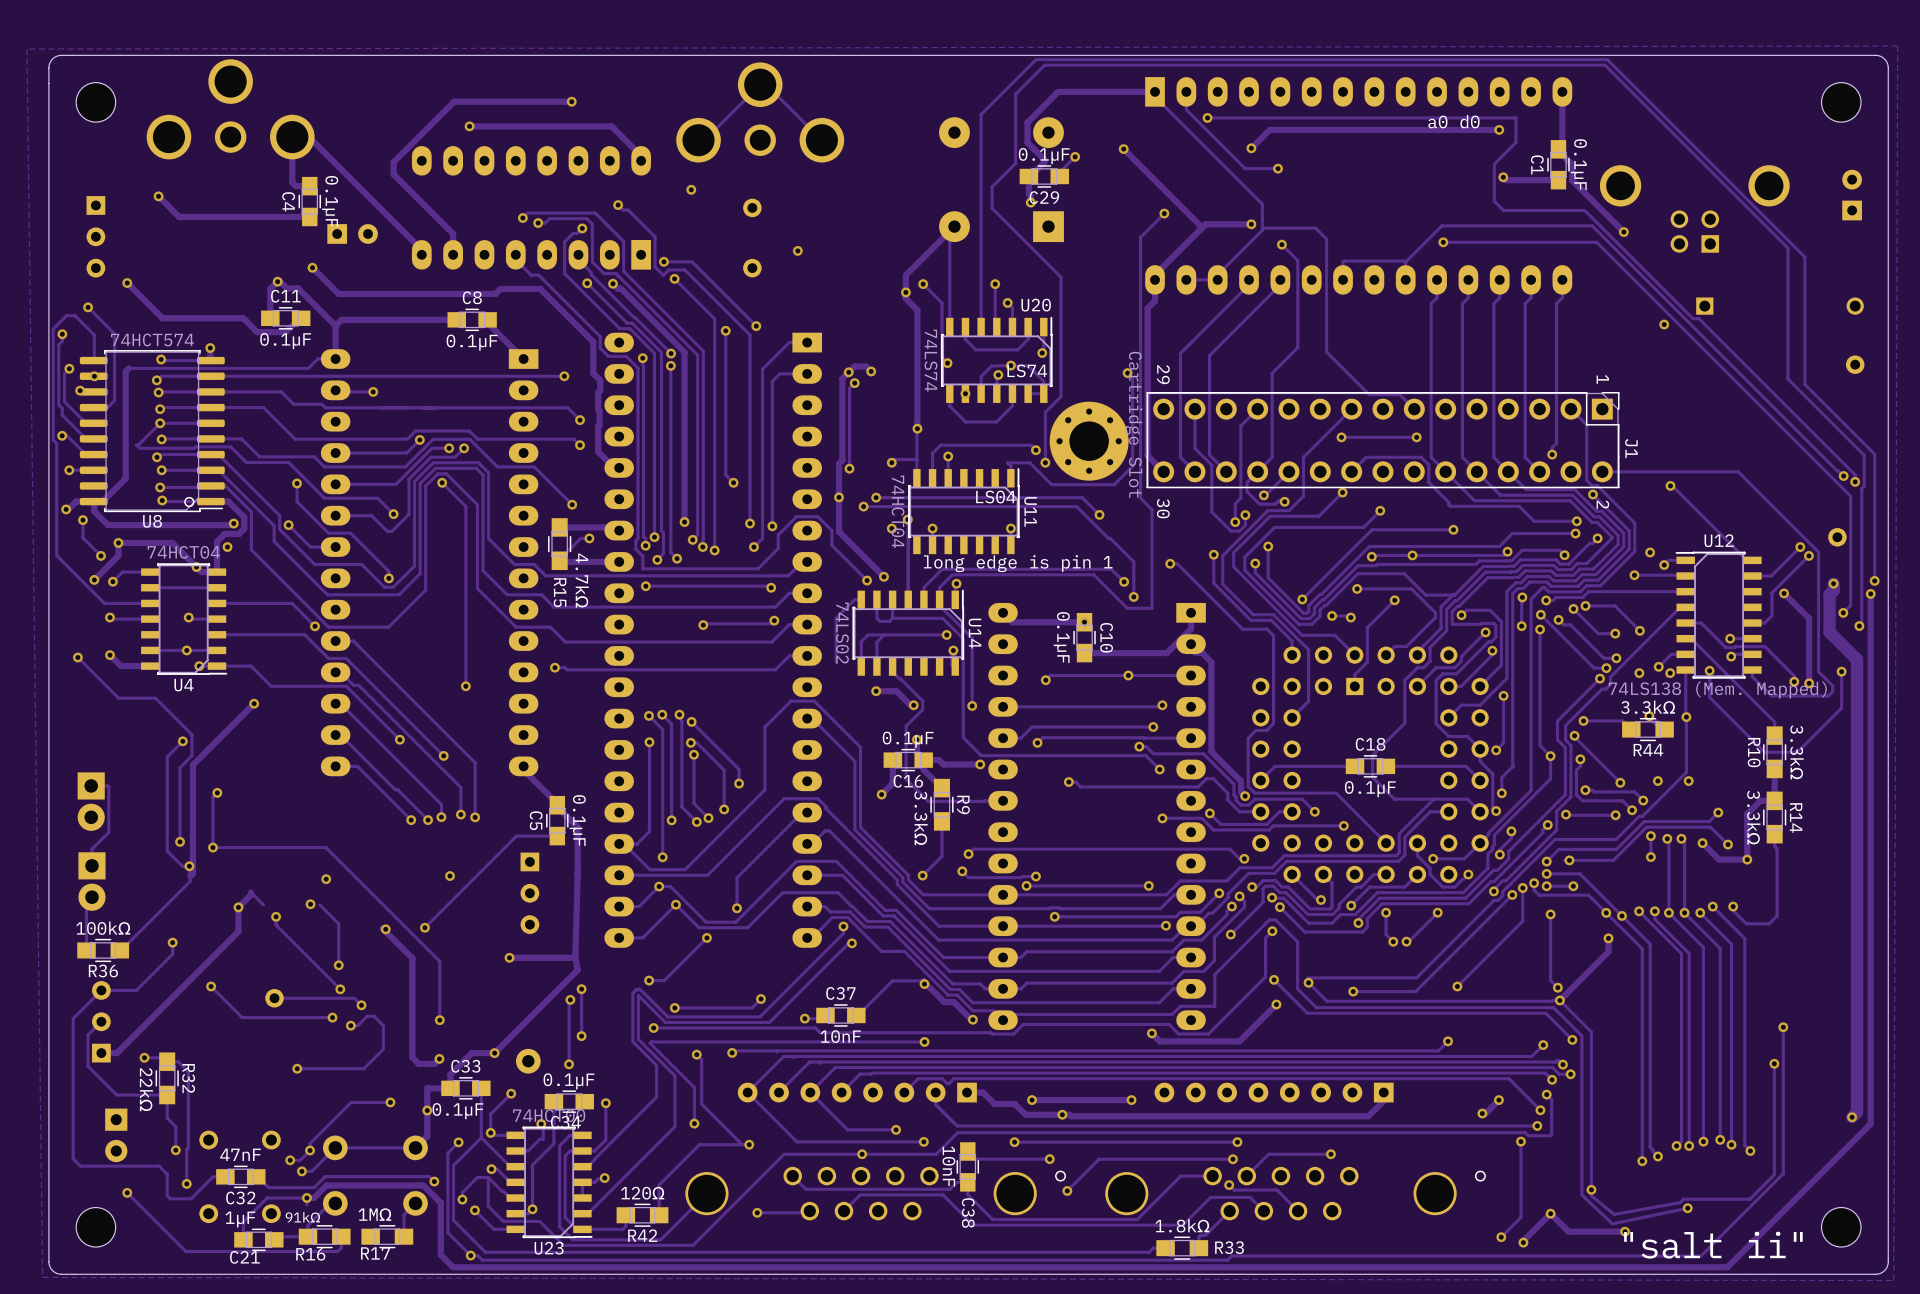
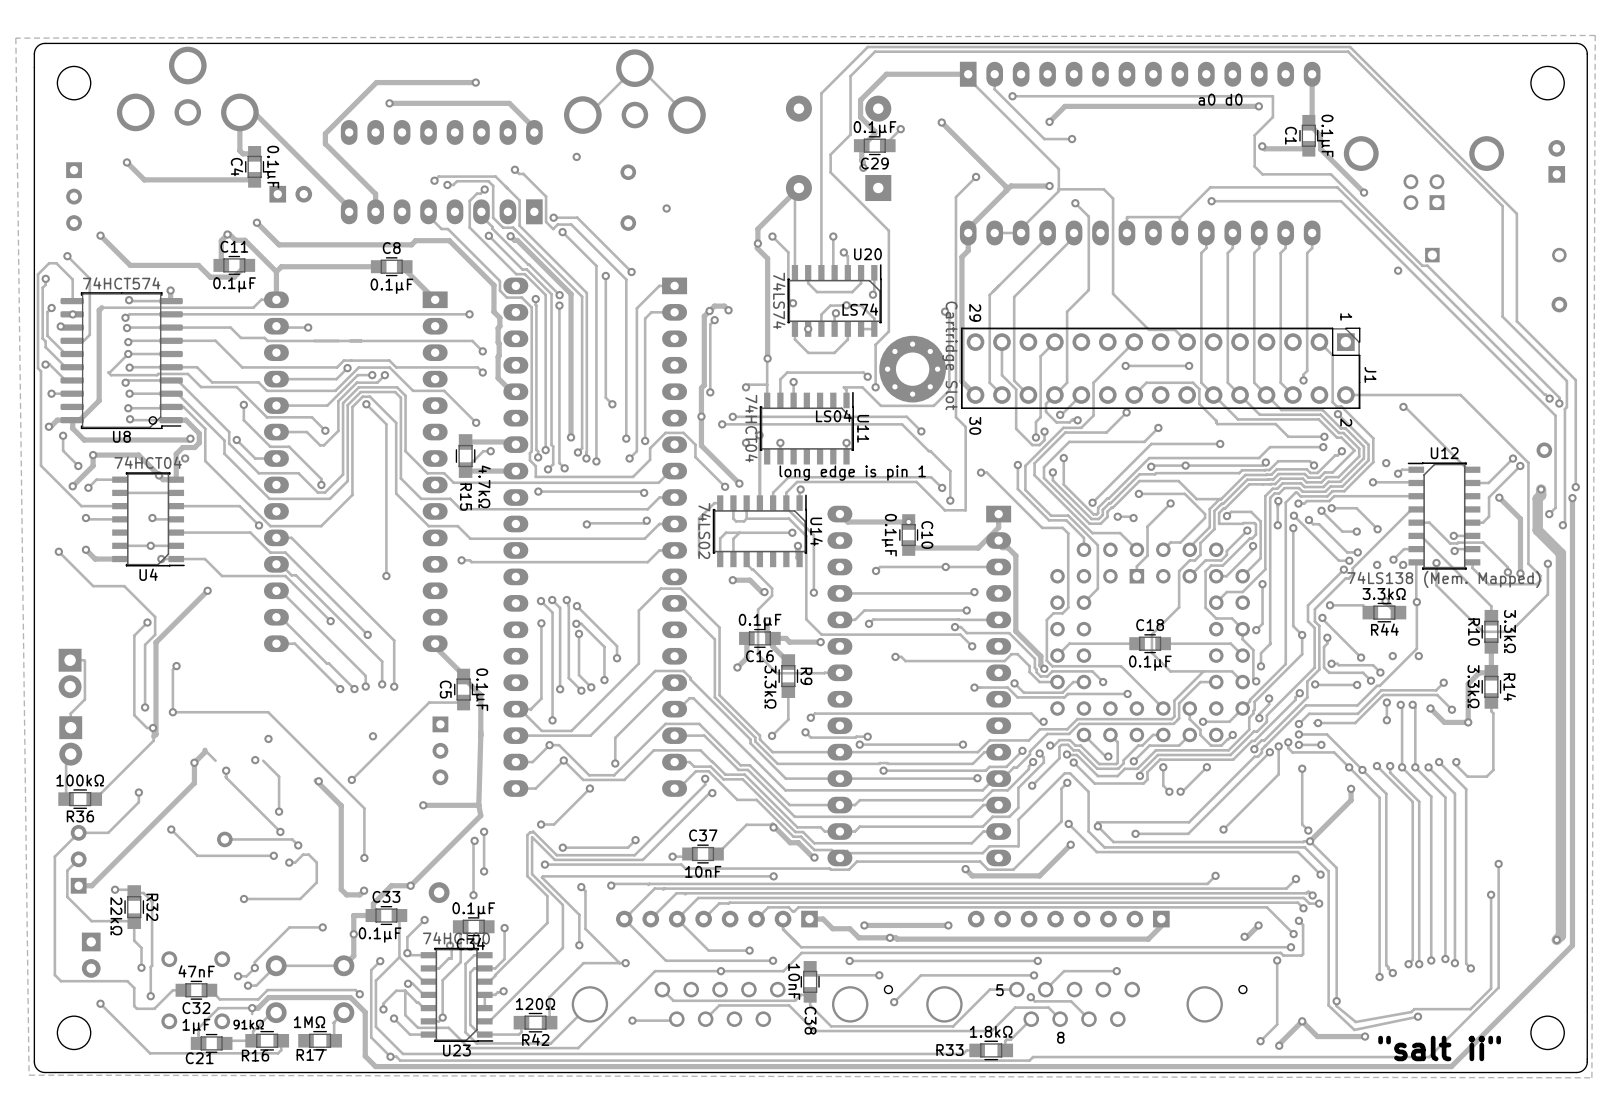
text: none -> 5 (999, 990)
text: none -> 8 (1060, 1037)
R33 name position: R33 (1229, 1247) -> R33 (949, 1050)

